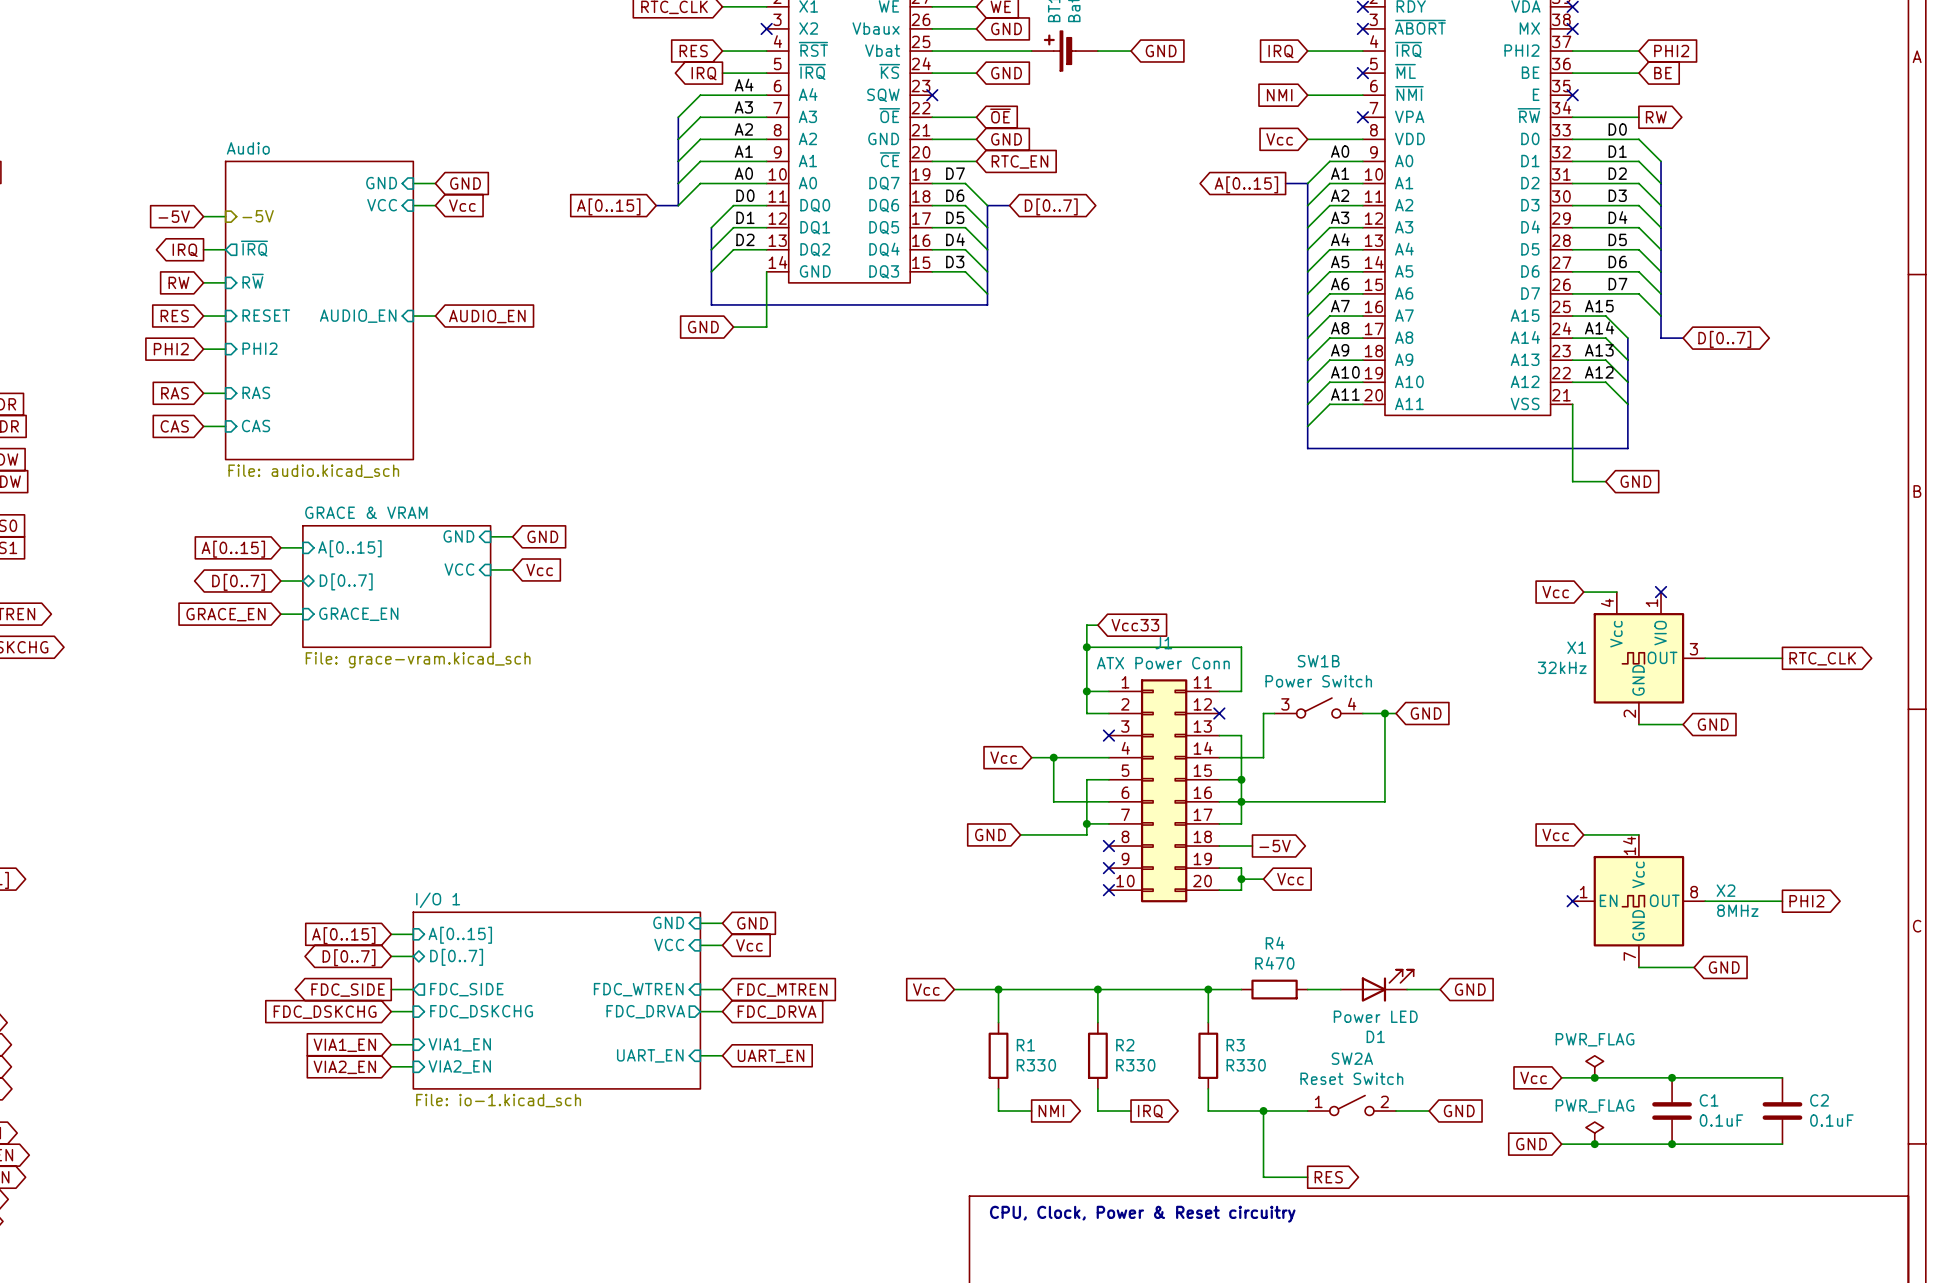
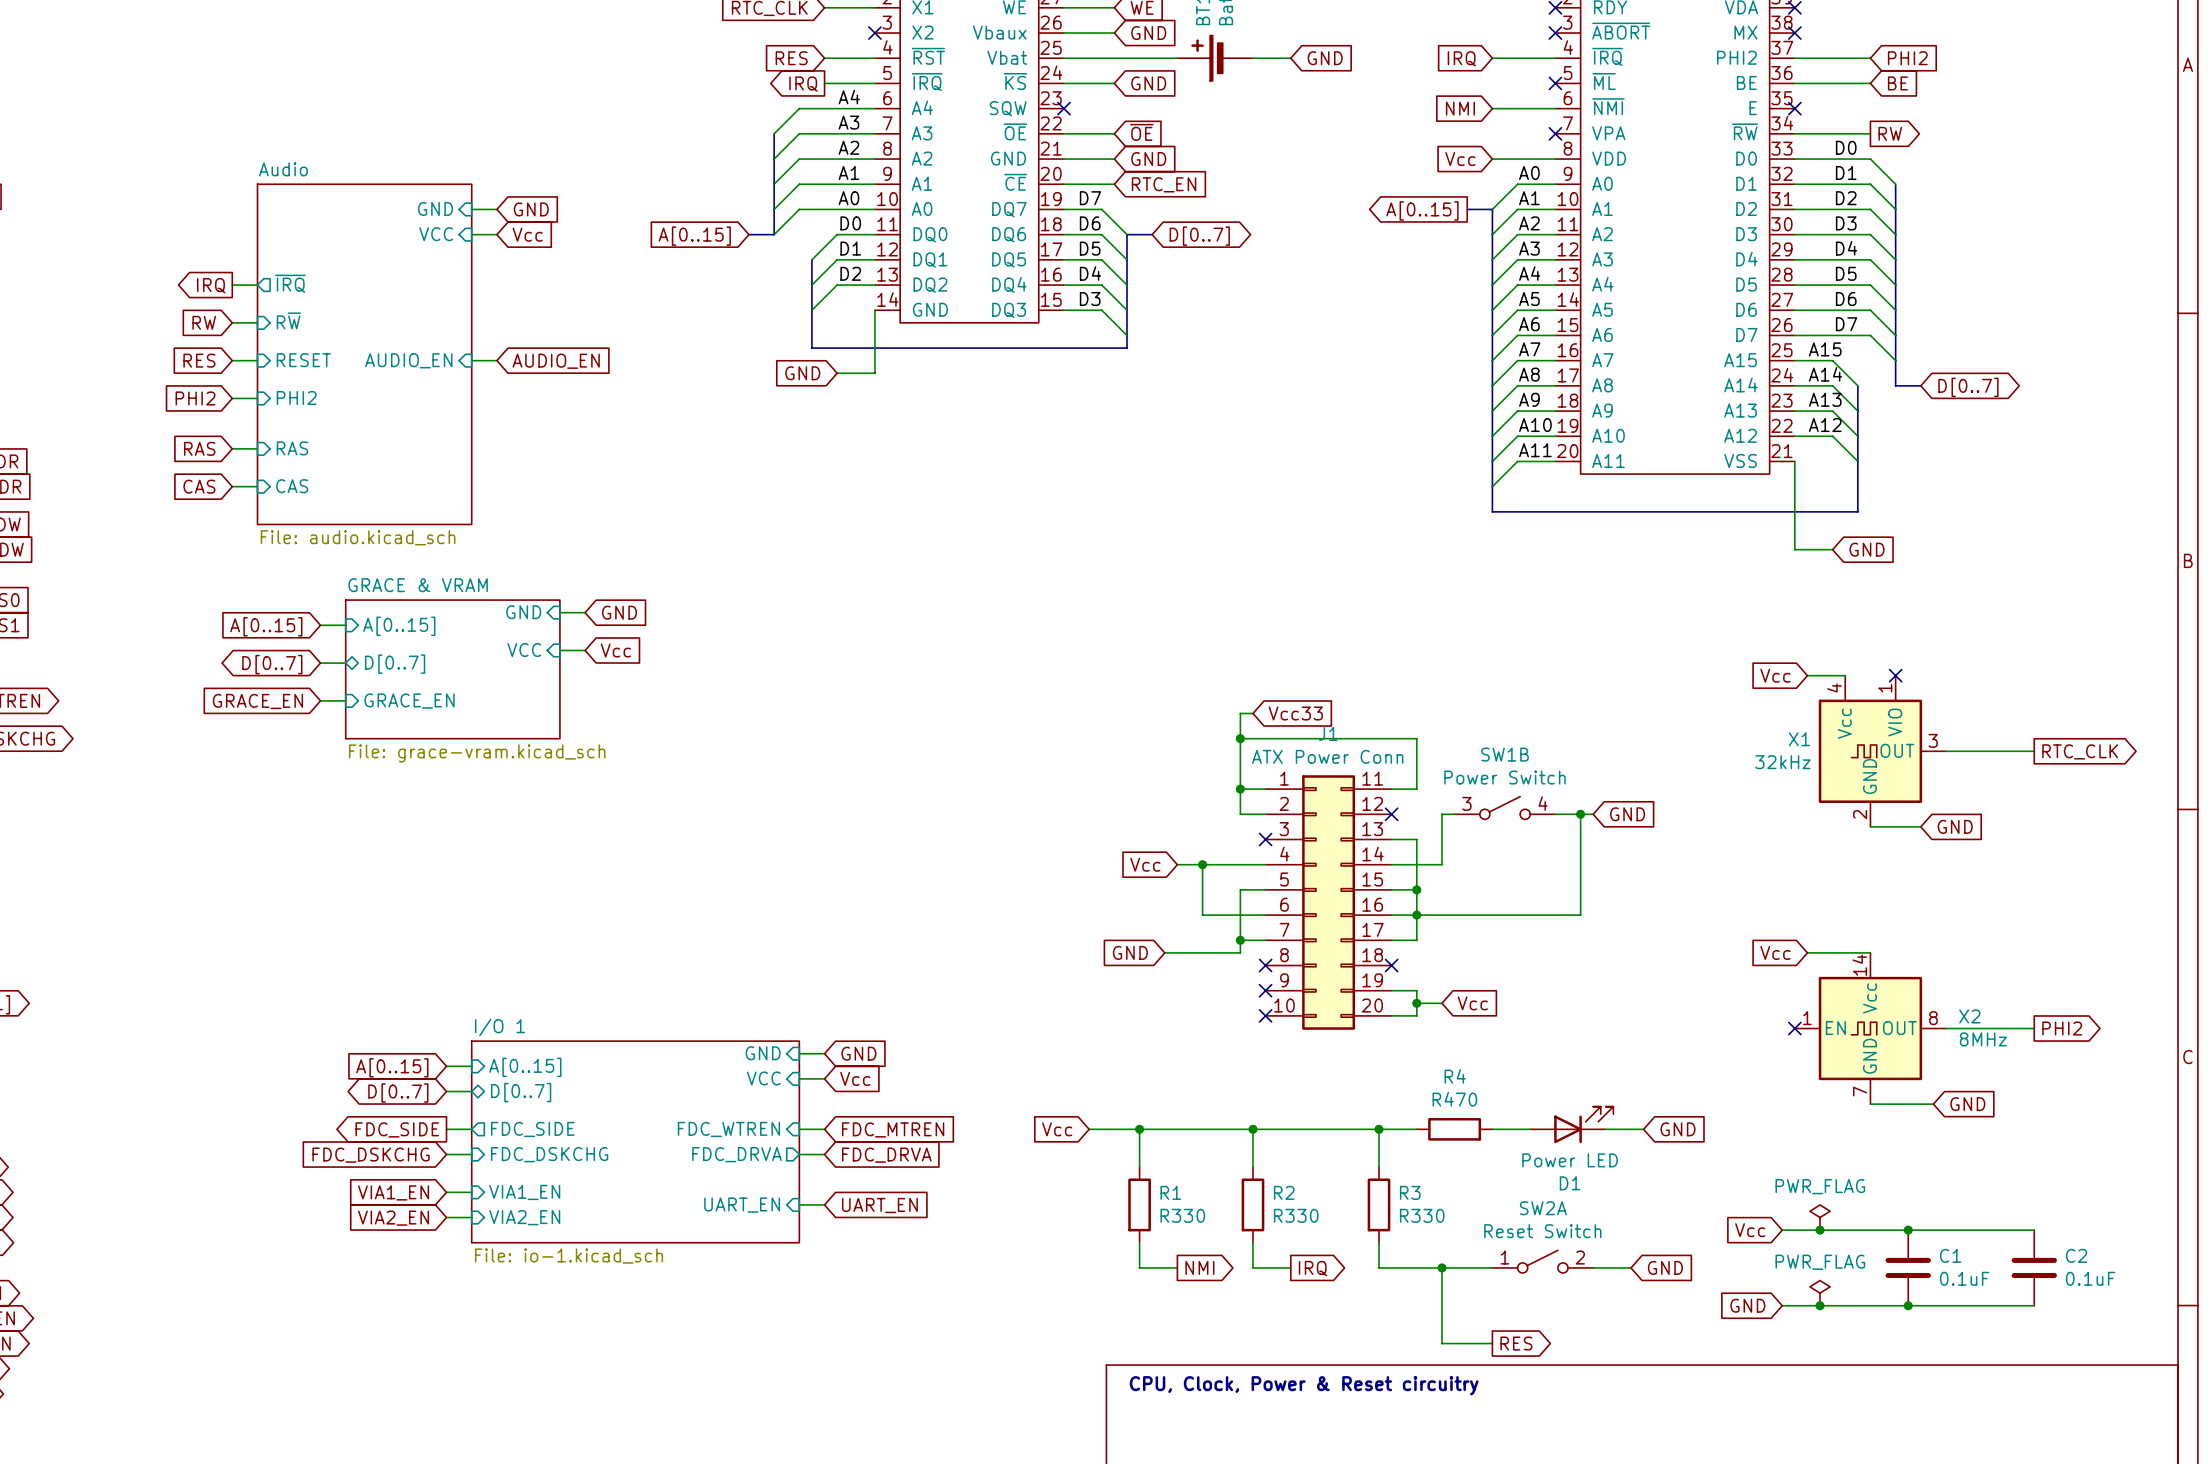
global label: -5V (174, 216) -> none
wire: (203, 216) (225, 216) -> none
hierarchical label: -5V (258, 216) -> none
wire: (1219, 846) (1252, 846) -> none
no-connect mark: none -> (1391, 965)
global label: -5V (1275, 846) -> none

